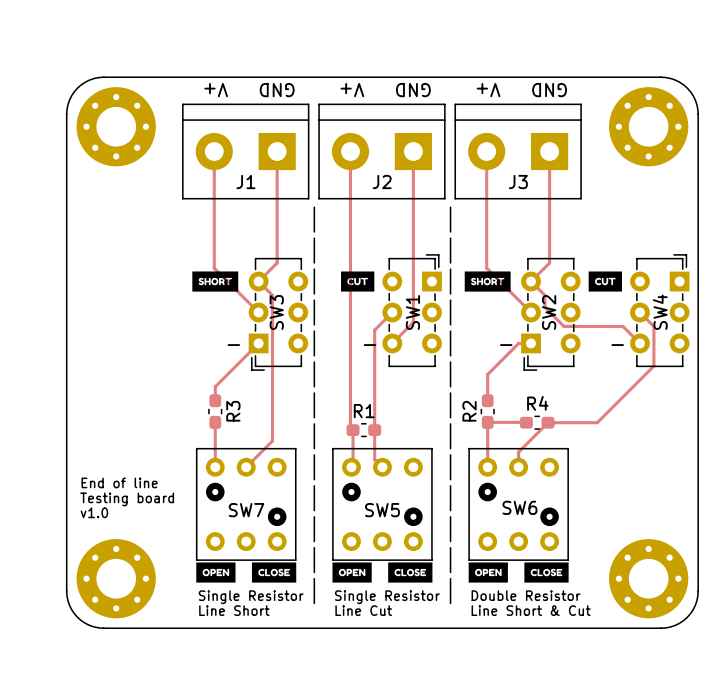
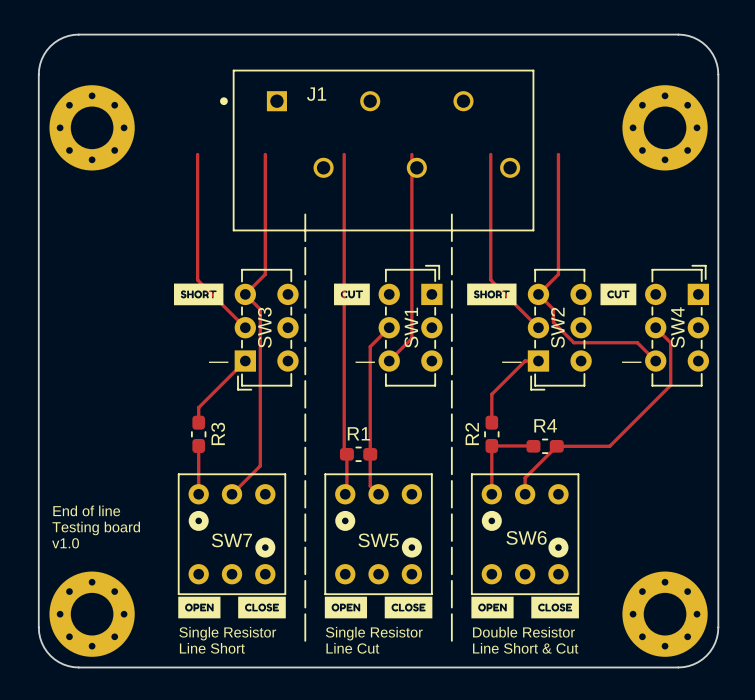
text: V+ (216, 90) -> none
text: GND (277, 90) -> none
text: V+ (352, 90) -> none
text: GND (413, 90) -> none
text: V+ (488, 90) -> none
text: GND (549, 90) -> none
J1 footprint: [182, 103, 310, 200] -> [220, 69, 535, 232]
board edge: (66, 114) (69, 100) (77, 88) (89, 80) (103, 77) (661, 77) (675, 80) (687, 88) (695, 100) (698, 114) -> (38, 114) (39, 69) (44, 54) (58, 39) (78, 34) (683, 34) (702, 42) (715, 59) (718, 74) (718, 114)
J2: (381, 151) -> none
J3: (518, 151) -> none
J1 name position: J1 (245, 182) -> J1 (316, 94)

